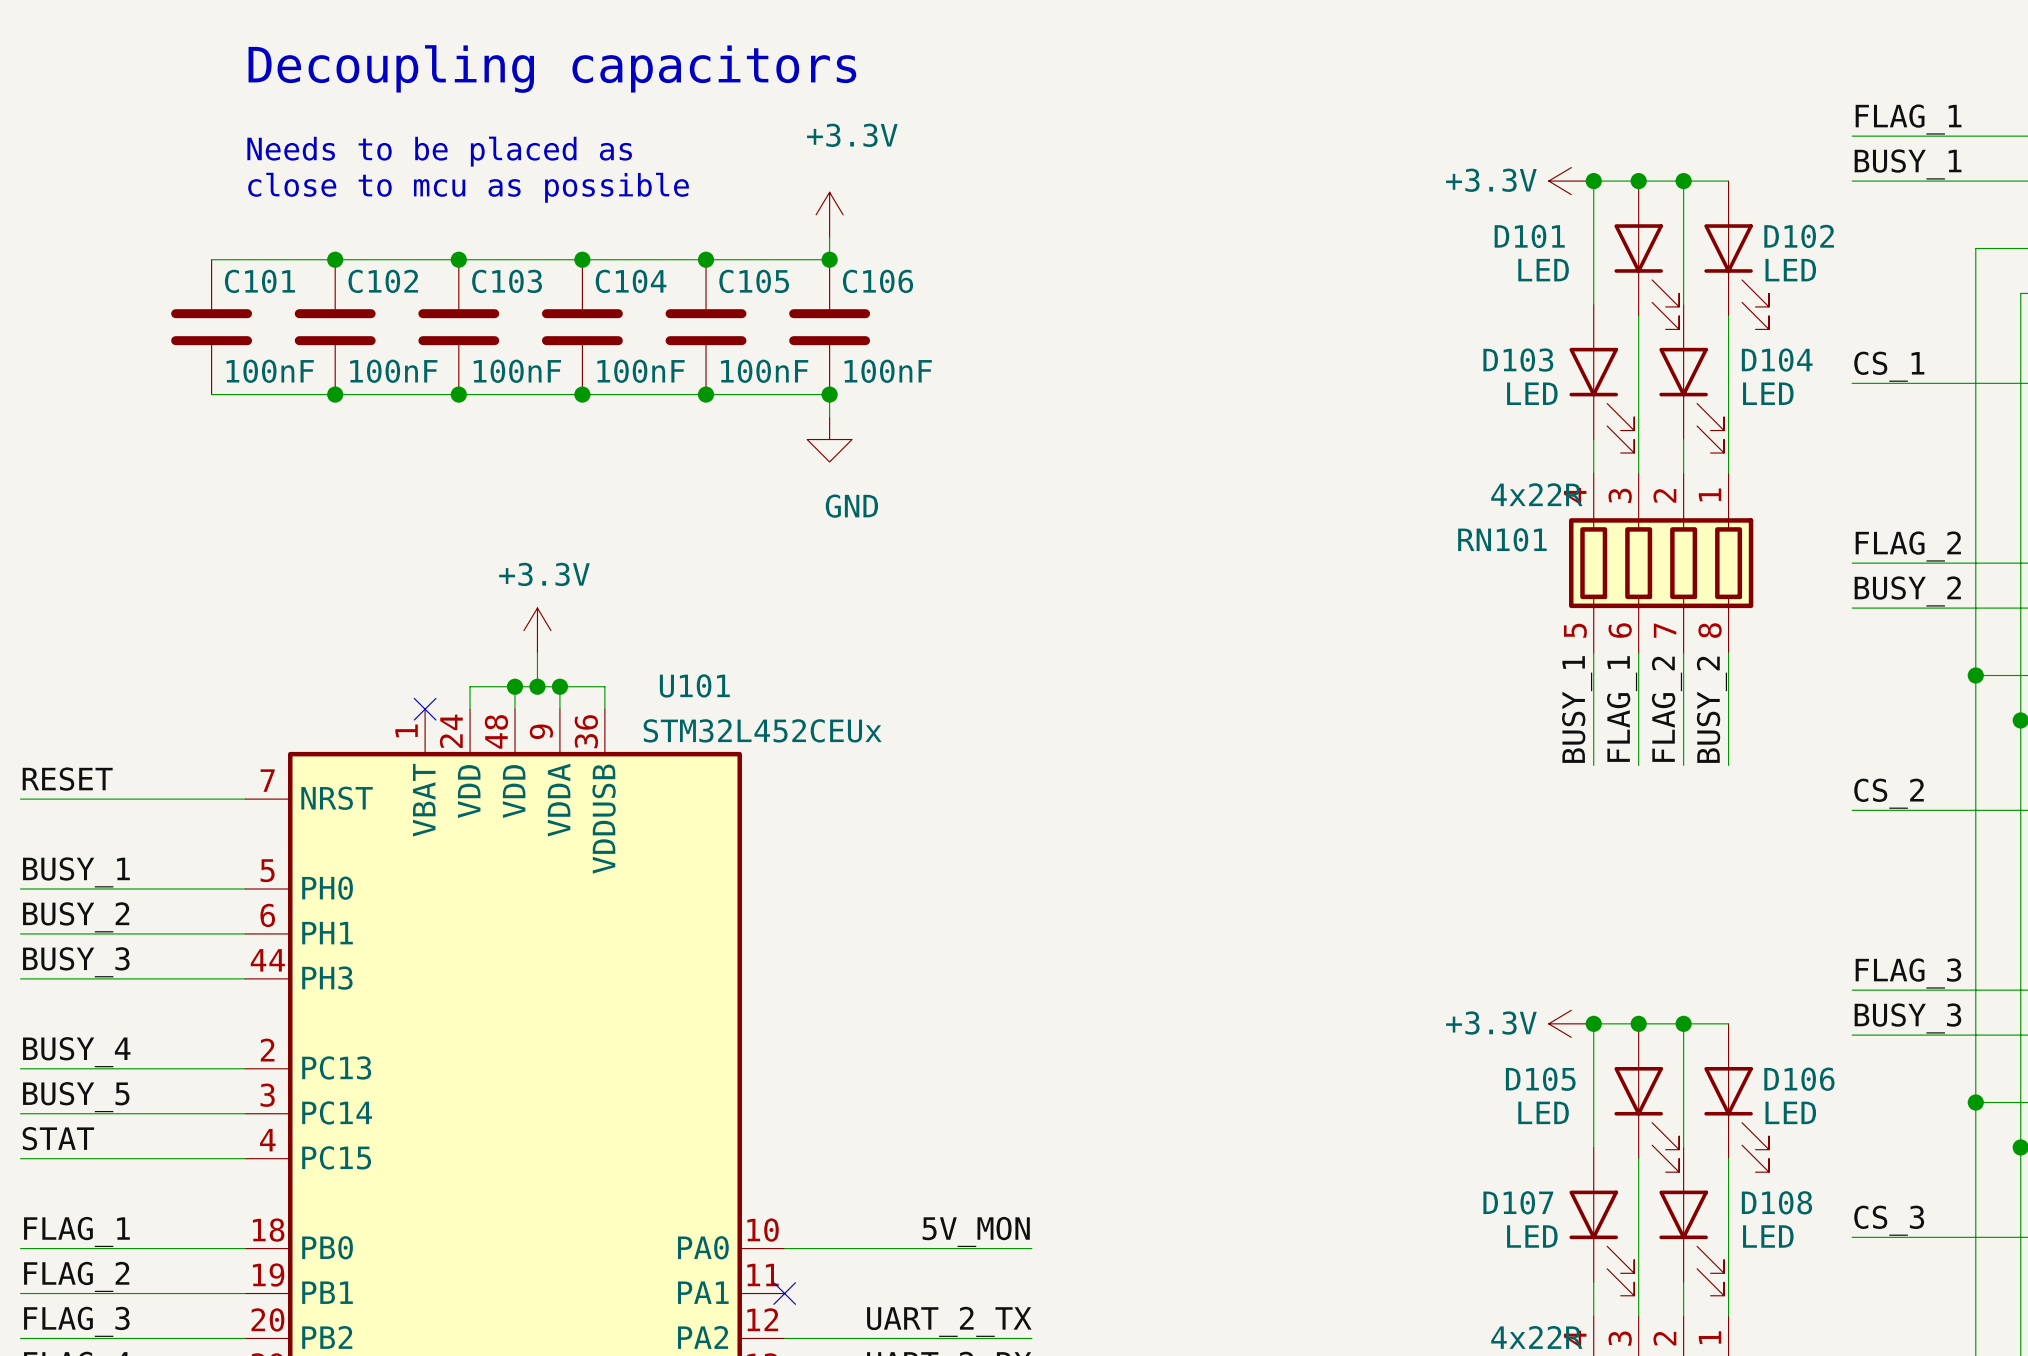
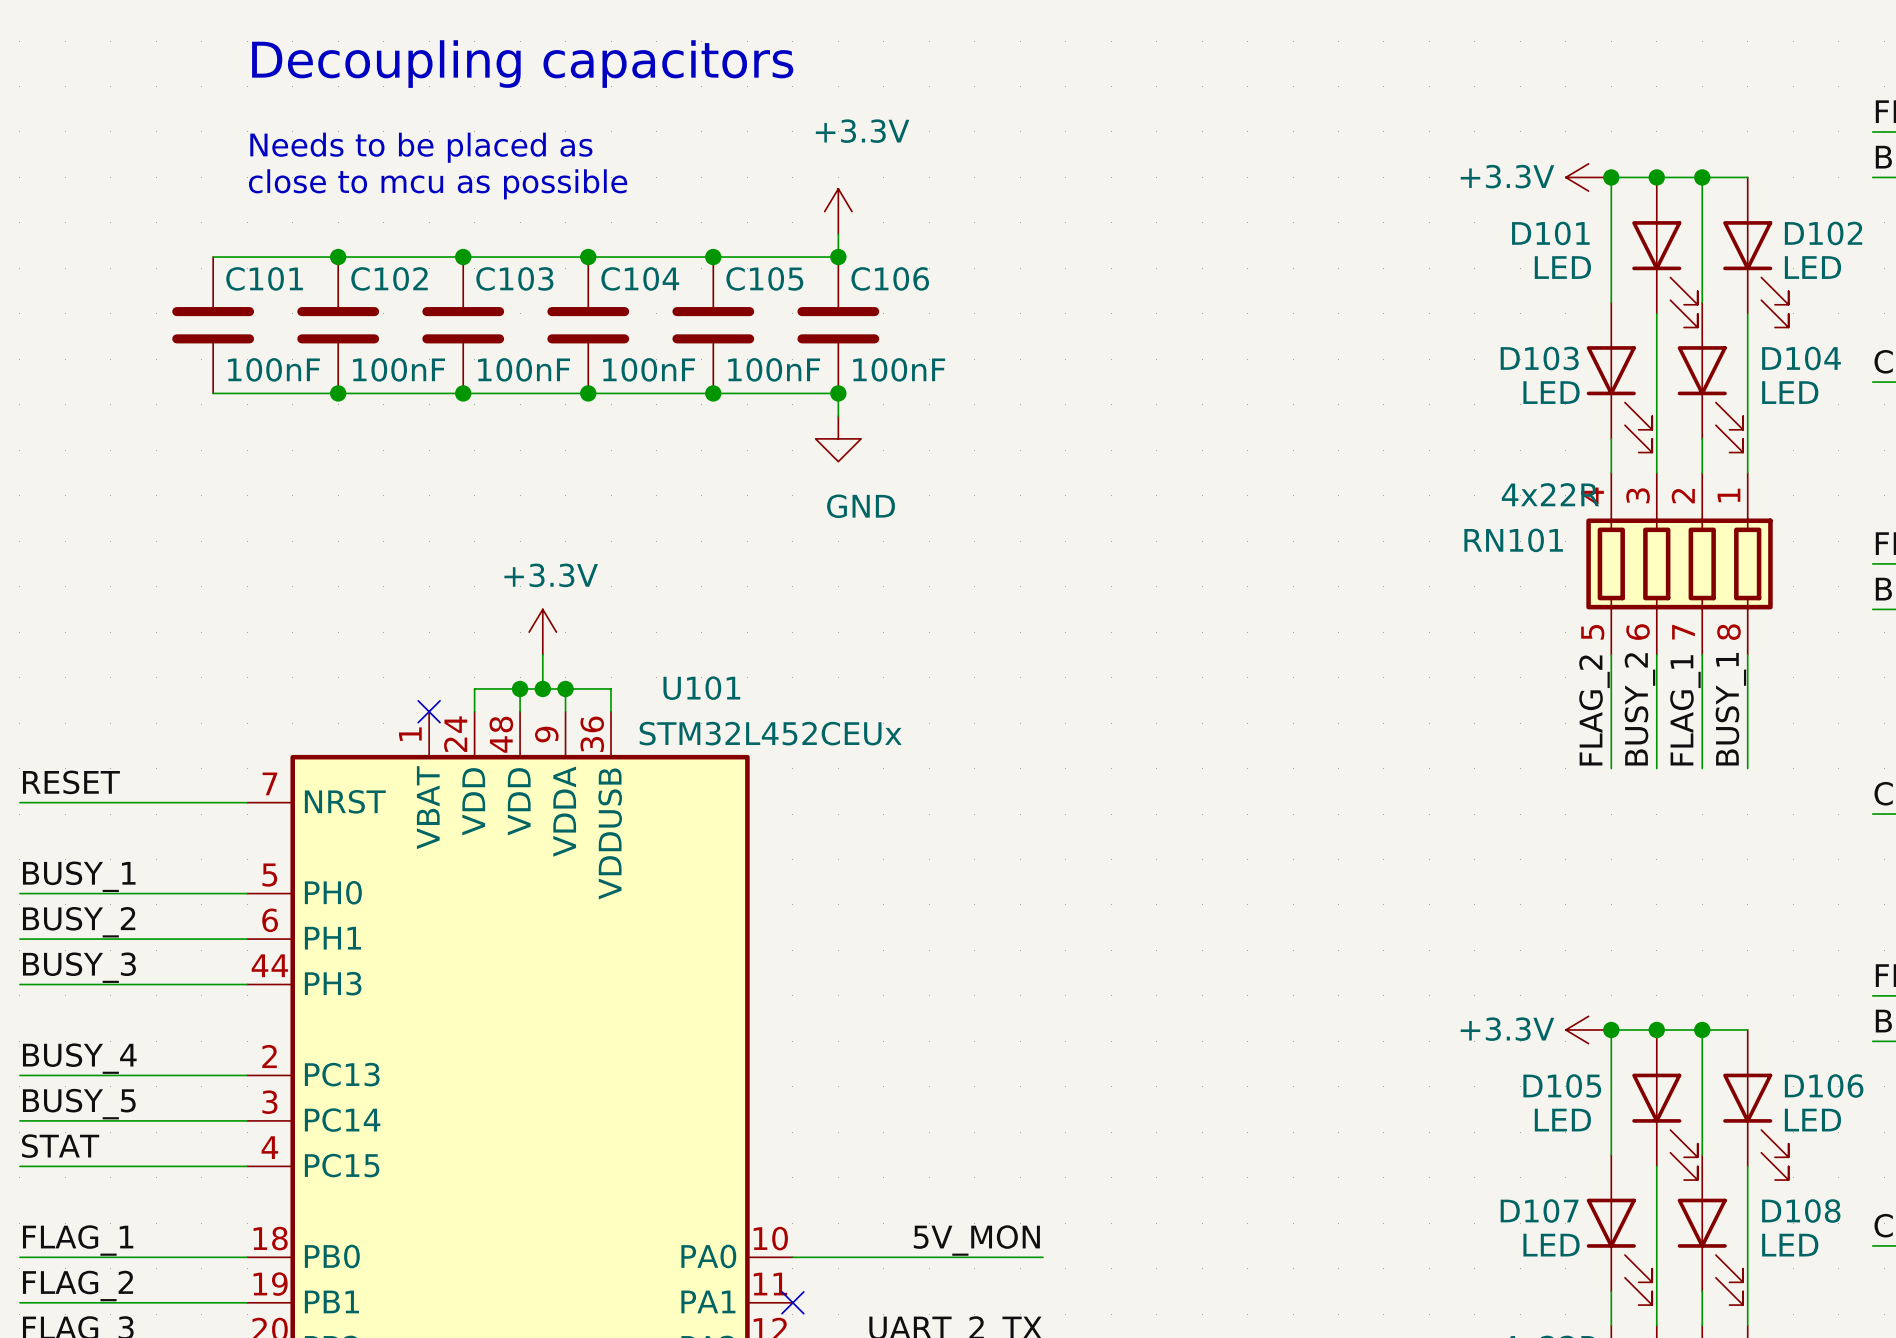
label: BUSY_1 (1577, 709) -> FLAG_2 (1594, 710)
label: FLAG_1 (1622, 709) -> BUSY_2 (1639, 709)
label: FLAG_2 (1667, 709) -> FLAG_1 (1685, 710)
label: BUSY_2 (1711, 709) -> BUSY_1 (1730, 709)

